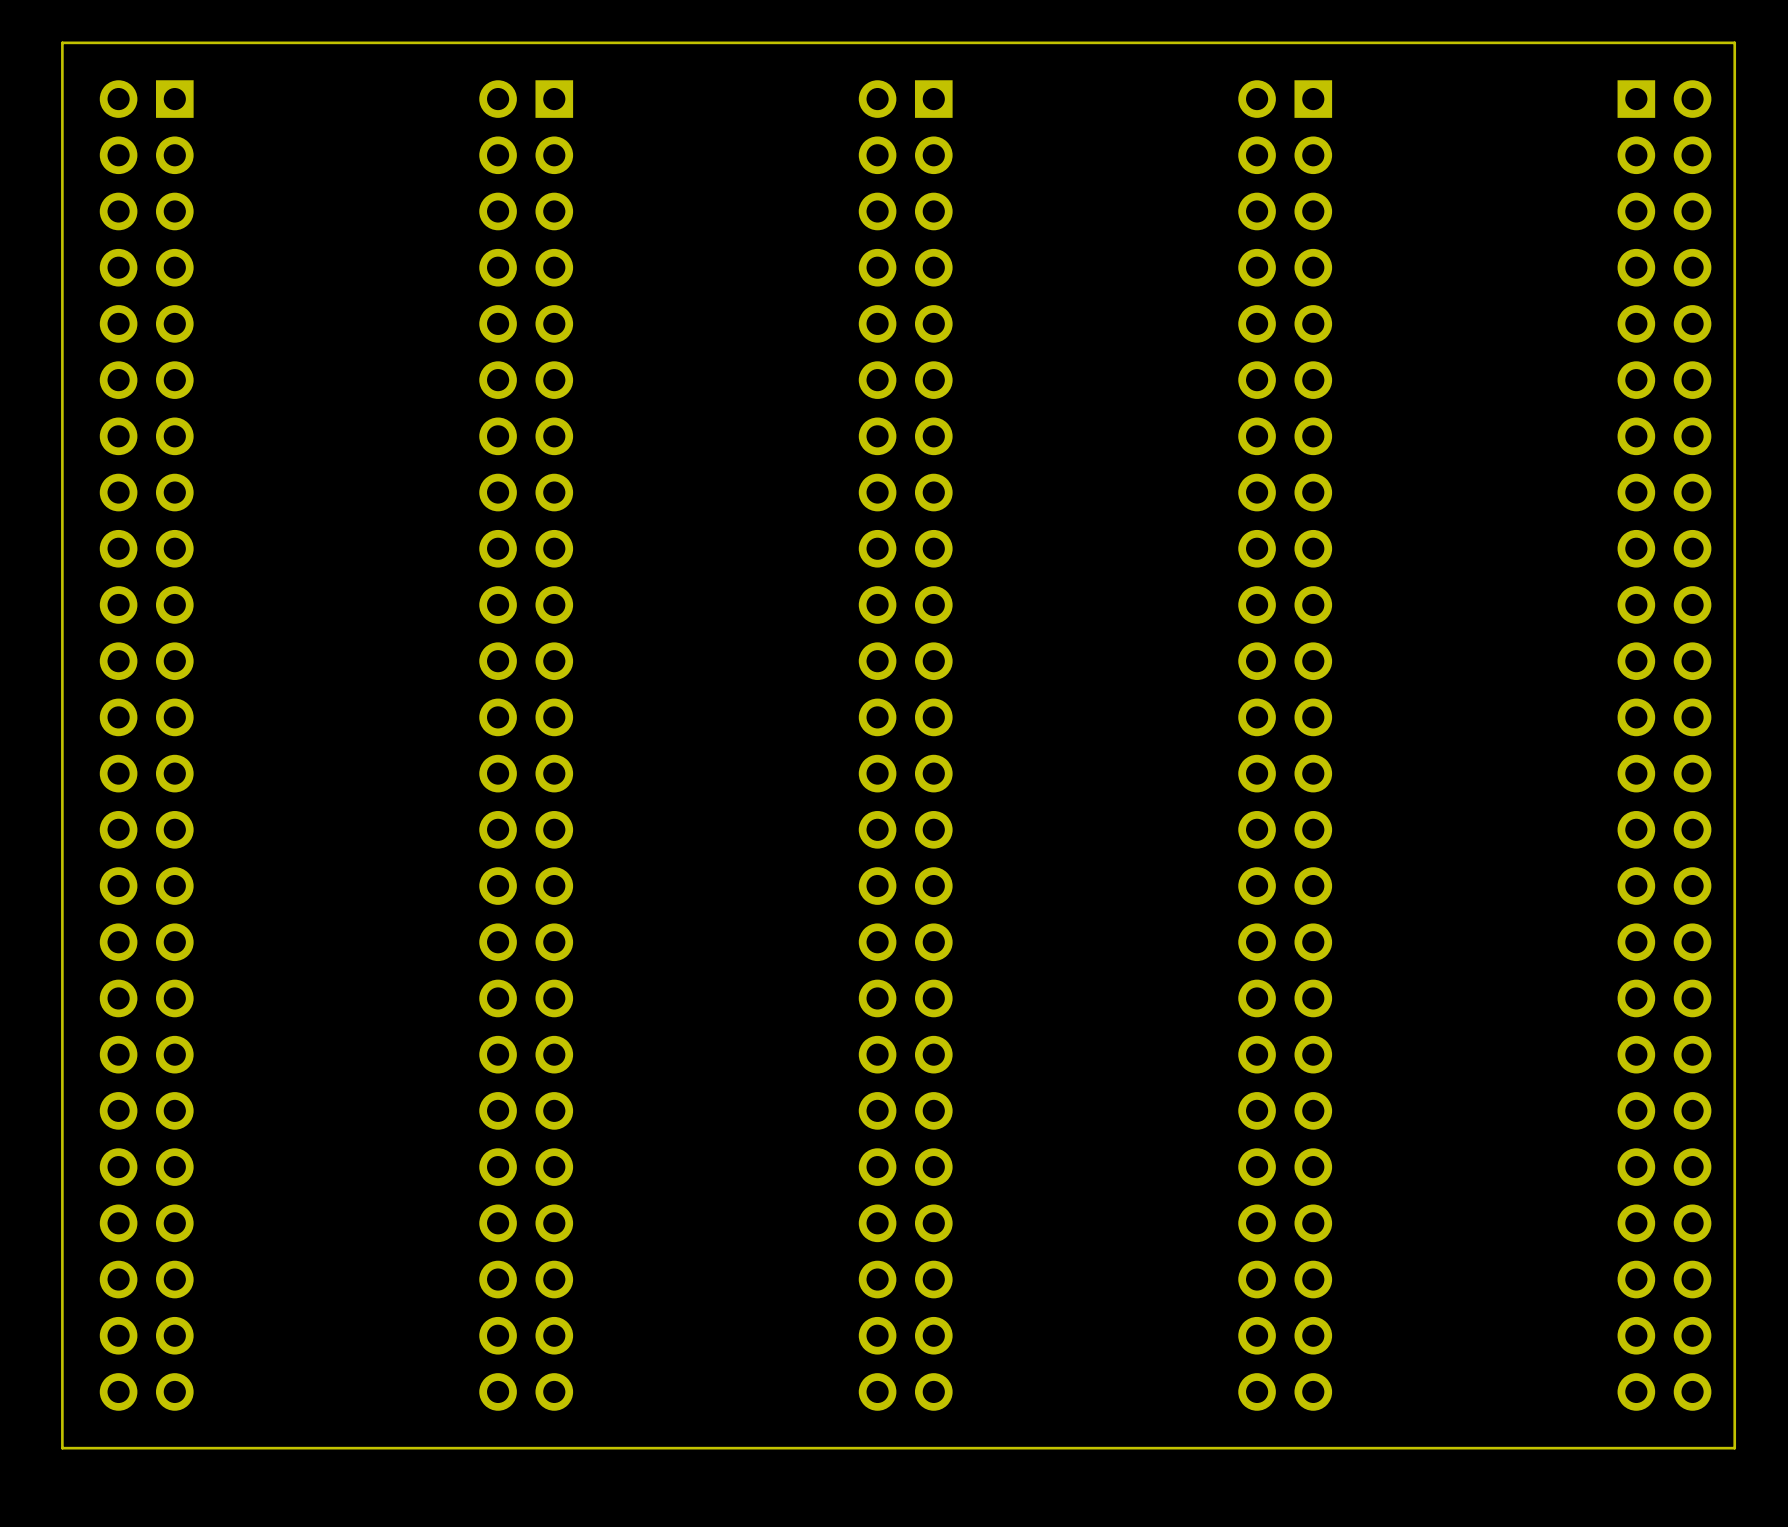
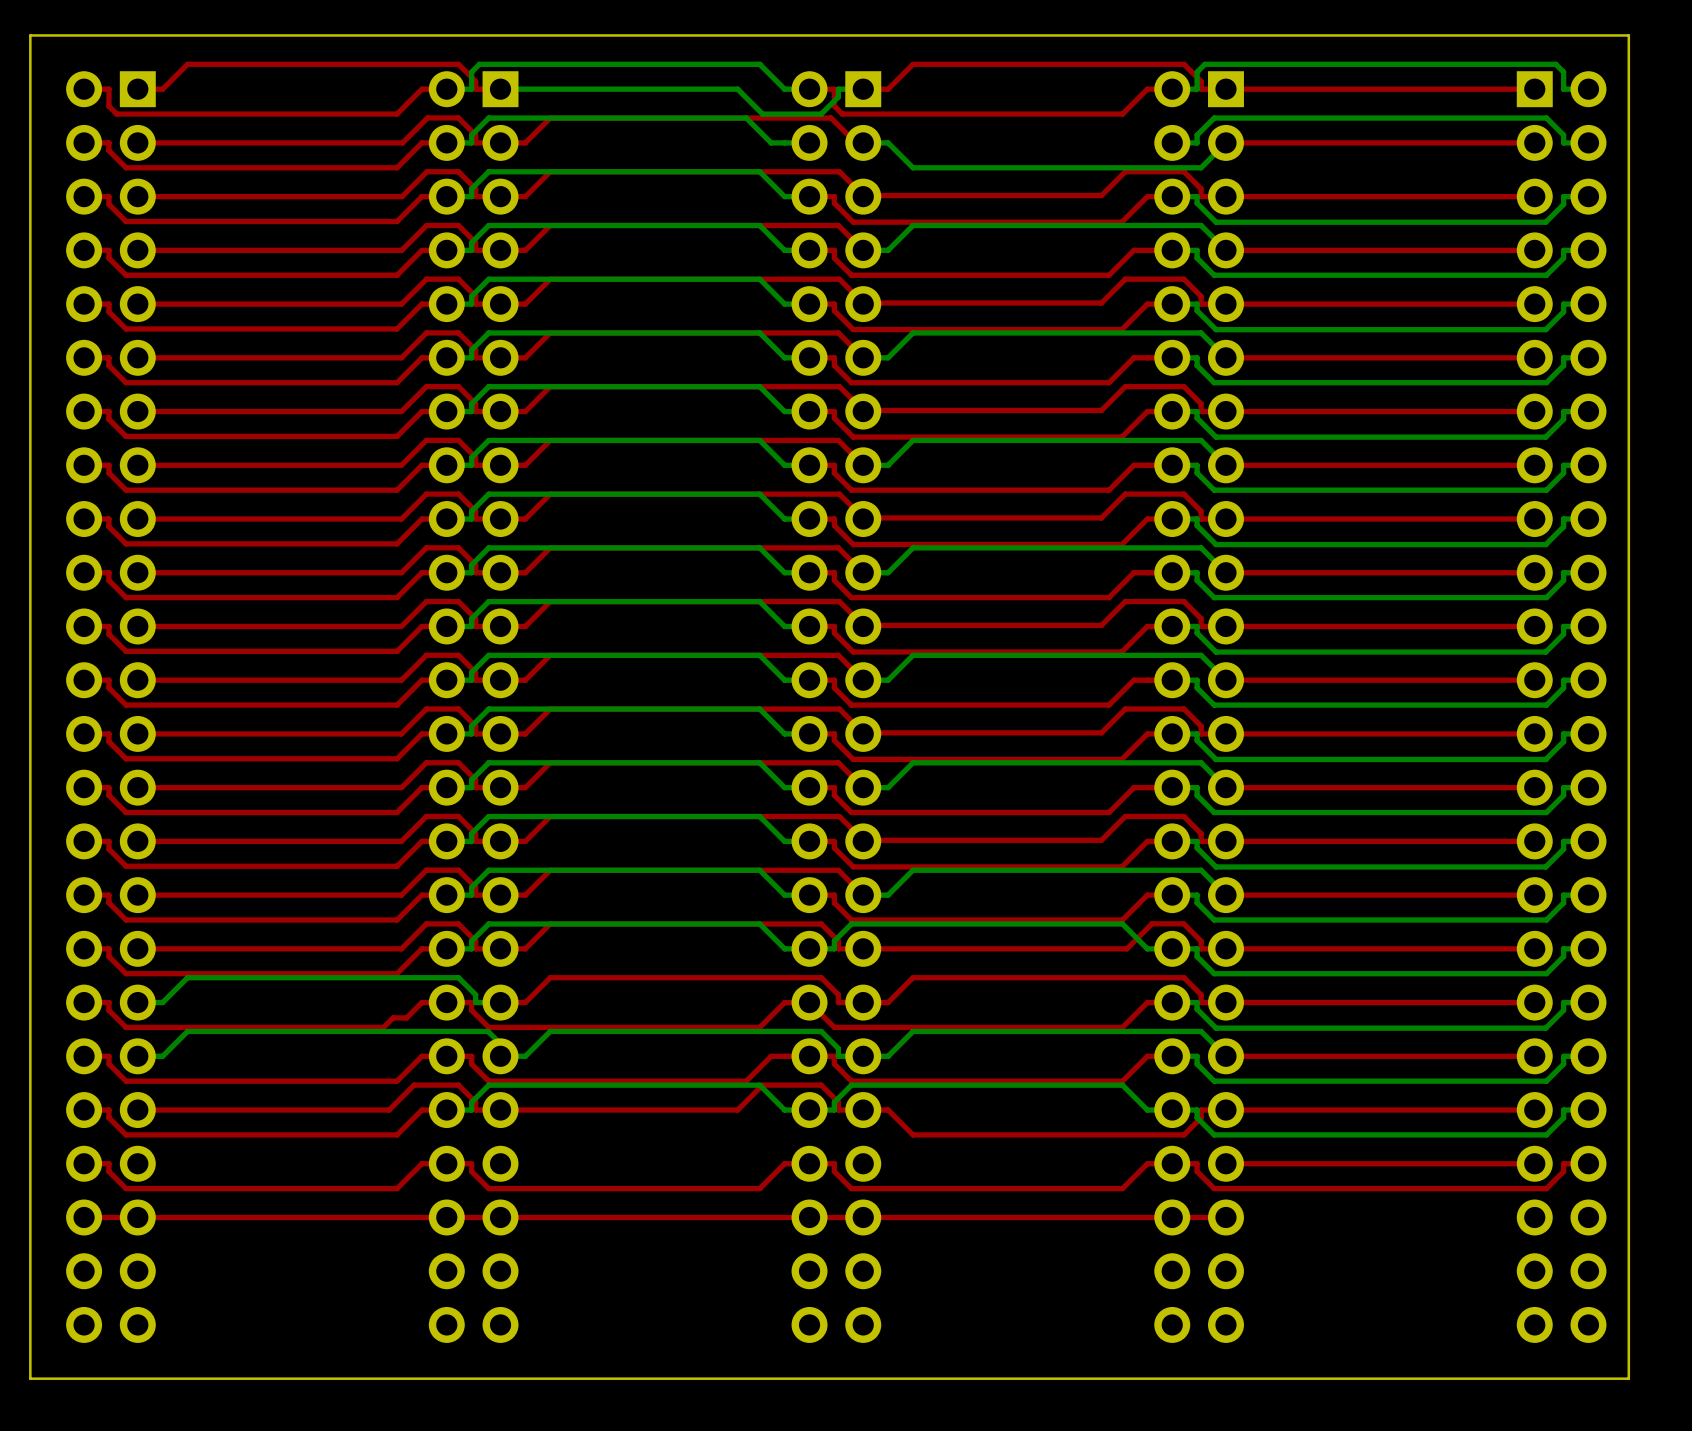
top track: none -> (446, 89) (421, 89) (397, 114) (116, 114) (108, 106) (108, 89) (84, 89)
top track: none -> (500, 89) (475, 89) (475, 81) (458, 64) (187, 64) (162, 89) (137, 89)
bottom track: none -> (809, 89) (784, 89) (759, 64) (479, 64) (471, 72) (471, 89) (446, 89)
bottom track: none -> (863, 89) (838, 89) (838, 96) (821, 114) (762, 114) (737, 89) (500, 89)
top track: none -> (1172, 89) (1147, 89) (1122, 114) (842, 114) (834, 106) (834, 89) (809, 89)
top track: none -> (1534, 89) (1201, 89) (1201, 81) (1184, 64) (912, 64) (888, 89) (863, 89)
bottom track: none -> (1588, 89) (1563, 89) (1563, 72) (1555, 64) (1204, 64) (1197, 72) (1197, 89) (1172, 89)
top track: none -> (446, 142) (421, 142) (397, 167) (126, 167) (108, 150) (108, 142) (84, 142)
bottom track: none -> (809, 142) (771, 142) (746, 118) (488, 118) (471, 135) (471, 142) (446, 142)
top track: none -> (863, 142) (855, 142) (831, 118) (550, 118) (525, 142) (475, 142) (475, 135) (458, 117) (427, 117) (402, 142) (137, 142)
bottom track: none -> (1225, 142) (1201, 167) (912, 167) (888, 142) (863, 142)
top track: none -> (1534, 142) (1225, 142)
bottom track: none -> (1588, 142) (1563, 142) (1563, 135) (1546, 118) (1214, 118) (1197, 135) (1197, 142) (1172, 142)
top track: none -> (863, 195) (1101, 195) (1125, 171) (1183, 171) (1201, 188) (1201, 196) (1534, 196)
top track: none -> (863, 195) (839, 171) (550, 171) (525, 196) (475, 196) (475, 188) (458, 171) (426, 171) (402, 196) (137, 196)
top track: none -> (446, 196) (421, 196) (397, 221) (126, 221) (108, 204) (108, 196) (84, 196)
bottom track: none -> (809, 196) (784, 196) (759, 171) (488, 171) (471, 188) (471, 196) (446, 196)
top track: none -> (1172, 196) (1147, 196) (1121, 222) (853, 222) (834, 203) (834, 196) (809, 196)
bottom track: none -> (1588, 196) (1563, 196) (1563, 204) (1545, 222) (1216, 222) (1197, 203) (1197, 196) (1172, 196)
top track: none -> (446, 250) (421, 250) (397, 275) (126, 275) (108, 258) (108, 250) (84, 250)
bottom track: none -> (809, 250) (784, 250) (759, 225) (488, 225) (471, 242) (471, 250) (446, 250)
top track: none -> (863, 250) (838, 225) (550, 225) (525, 250) (475, 250) (475, 242) (458, 225) (426, 225) (401, 250) (137, 250)
top track: none -> (1172, 250) (1133, 250) (1109, 275) (851, 275) (834, 258) (834, 250) (809, 250)
bottom track: none -> (1225, 250) (1201, 225) (912, 225) (888, 250) (863, 250)
top track: none -> (1534, 250) (1225, 250)
bottom track: none -> (1588, 250) (1563, 250) (1563, 258) (1546, 275) (1214, 275) (1197, 258) (1197, 250) (1172, 250)
top track: none -> (863, 303) (839, 279) (550, 279) (525, 304) (475, 304) (475, 296) (458, 279) (426, 279) (401, 304) (137, 304)
top track: none -> (863, 303) (1101, 303) (1125, 279) (1183, 279) (1201, 296) (1201, 304) (1534, 304)
top track: none -> (446, 304) (421, 304) (397, 328) (126, 328) (108, 311) (108, 304) (84, 304)
bottom track: none -> (809, 304) (784, 304) (759, 279) (488, 279) (471, 296) (471, 304) (446, 304)
top track: none -> (1172, 304) (1147, 304) (1121, 329) (853, 329) (834, 310) (834, 304) (809, 304)
bottom track: none -> (1588, 304) (1563, 304) (1563, 311) (1545, 329) (1216, 329) (1197, 310) (1197, 304) (1172, 304)
top track: none -> (446, 357) (421, 357) (397, 382) (126, 382) (108, 365) (108, 357) (84, 357)
bottom track: none -> (809, 357) (784, 357) (759, 332) (488, 332) (471, 350) (471, 357) (446, 357)
top track: none -> (863, 357) (838, 332) (550, 332) (525, 357) (475, 357) (475, 350) (458, 332) (426, 332) (401, 357) (137, 357)
top track: none -> (1172, 357) (1133, 357) (1109, 382) (851, 382) (834, 365) (834, 357) (809, 357)
bottom track: none -> (1225, 357) (1201, 332) (912, 332) (888, 357) (863, 357)
top track: none -> (1534, 357) (1225, 357)
bottom track: none -> (1588, 357) (1563, 357) (1563, 365) (1546, 382) (1214, 382) (1197, 365) (1197, 357) (1172, 357)
top track: none -> (863, 410) (839, 386) (550, 386) (525, 411) (475, 411) (475, 403) (458, 386) (426, 386) (401, 411) (137, 411)
top track: none -> (863, 410) (1101, 410) (1125, 386) (1183, 386) (1201, 403) (1201, 411) (1534, 411)
top track: none -> (446, 411) (421, 411) (397, 436) (126, 436) (108, 419) (108, 411) (84, 411)
bottom track: none -> (809, 411) (784, 411) (759, 386) (488, 386) (471, 403) (471, 411) (446, 411)
top track: none -> (1172, 411) (1147, 411) (1121, 437) (853, 437) (834, 418) (834, 411) (809, 411)
bottom track: none -> (1588, 411) (1563, 411) (1563, 419) (1545, 437) (1216, 437) (1197, 418) (1197, 411) (1172, 411)
top track: none -> (446, 465) (421, 465) (397, 490) (126, 490) (108, 473) (108, 465) (84, 465)
bottom track: none -> (809, 465) (784, 465) (759, 440) (488, 440) (471, 457) (471, 465) (446, 465)
top track: none -> (863, 465) (838, 440) (550, 440) (525, 465) (475, 465) (475, 457) (458, 440) (426, 440) (401, 465) (137, 465)
top track: none -> (1172, 465) (1133, 465) (1109, 490) (851, 490) (834, 473) (834, 465) (809, 465)
bottom track: none -> (1225, 465) (1201, 440) (912, 440) (888, 465) (863, 465)
top track: none -> (1534, 465) (1225, 465)
bottom track: none -> (1588, 465) (1563, 465) (1563, 473) (1546, 490) (1214, 490) (1197, 473) (1197, 465) (1172, 465)
top track: none -> (863, 517) (839, 494) (550, 494) (525, 519) (475, 519) (475, 511) (458, 494) (426, 494) (401, 519) (137, 519)
top track: none -> (863, 517) (1101, 517) (1125, 494) (1183, 494) (1201, 511) (1201, 519) (1534, 519)
top track: none -> (446, 519) (421, 519) (397, 543) (126, 543) (108, 526) (108, 519) (84, 519)
bottom track: none -> (809, 519) (784, 519) (759, 494) (488, 494) (471, 511) (471, 519) (446, 519)
top track: none -> (1172, 519) (1147, 519) (1121, 544) (853, 544) (834, 525) (834, 519) (809, 519)
bottom track: none -> (1588, 519) (1563, 519) (1563, 526) (1545, 544) (1216, 544) (1197, 525) (1197, 519) (1172, 519)
top track: none -> (446, 572) (421, 572) (397, 597) (126, 597) (108, 580) (108, 572) (84, 572)
bottom track: none -> (809, 572) (784, 572) (759, 547) (488, 547) (471, 564) (471, 572) (446, 572)
top track: none -> (863, 572) (838, 547) (550, 547) (525, 572) (475, 572) (475, 564) (458, 547) (426, 547) (401, 572) (137, 572)
top track: none -> (1172, 572) (1133, 572) (1109, 597) (851, 597) (834, 580) (834, 572) (809, 572)
bottom track: none -> (1225, 572) (1201, 547) (912, 547) (888, 572) (863, 572)
top track: none -> (1534, 572) (1225, 572)
bottom track: none -> (1588, 572) (1563, 572) (1563, 580) (1546, 597) (1214, 597) (1197, 580) (1197, 572) (1172, 572)
top track: none -> (863, 625) (839, 601) (550, 601) (525, 626) (475, 626) (475, 618) (458, 601) (426, 601) (401, 626) (137, 626)
top track: none -> (863, 625) (1101, 625) (1125, 601) (1183, 601) (1201, 618) (1201, 626) (1534, 626)
top track: none -> (446, 626) (421, 626) (397, 651) (126, 651) (108, 634) (108, 626) (84, 626)
bottom track: none -> (809, 626) (784, 626) (759, 601) (488, 601) (471, 618) (471, 626) (446, 626)
top track: none -> (1172, 626) (1147, 626) (1121, 651) (853, 651) (834, 633) (834, 626) (809, 626)
bottom track: none -> (1588, 626) (1563, 626) (1563, 634) (1545, 652) (1216, 652) (1197, 633) (1197, 626) (1172, 626)
top track: none -> (446, 680) (421, 680) (397, 705) (126, 705) (108, 687) (108, 680) (84, 680)
bottom track: none -> (809, 680) (784, 680) (759, 655) (488, 655) (471, 672) (471, 680) (446, 680)
top track: none -> (863, 680) (838, 655) (550, 655) (525, 680) (475, 680) (475, 672) (458, 655) (426, 655) (401, 680) (137, 680)
top track: none -> (1172, 680) (1133, 680) (1109, 705) (851, 705) (834, 687) (834, 680) (809, 680)
bottom track: none -> (1225, 680) (1201, 655) (912, 655) (888, 680) (863, 680)
top track: none -> (1534, 680) (1225, 680)
bottom track: none -> (1588, 680) (1563, 680) (1563, 687) (1546, 705) (1214, 705) (1197, 687) (1197, 680) (1172, 680)
top track: none -> (863, 732) (839, 709) (550, 709) (525, 733) (475, 733) (475, 726) (458, 709) (426, 709) (401, 733) (137, 733)
top track: none -> (863, 732) (1101, 732) (1125, 709) (1183, 709) (1201, 726) (1201, 733) (1534, 733)
top track: none -> (446, 733) (421, 733) (397, 758) (126, 758) (108, 741) (108, 733) (84, 733)
bottom track: none -> (809, 733) (784, 733) (759, 709) (488, 709) (471, 726) (471, 733) (446, 733)
top track: none -> (1172, 733) (1147, 733) (1121, 759) (853, 759) (834, 740) (834, 733) (809, 733)
bottom track: none -> (1588, 733) (1563, 733) (1563, 741) (1545, 759) (1216, 759) (1197, 740) (1197, 733) (1172, 733)
top track: none -> (446, 787) (421, 787) (397, 812) (126, 812) (108, 795) (108, 787) (84, 787)
bottom track: none -> (809, 787) (784, 787) (759, 762) (488, 762) (471, 779) (471, 787) (446, 787)
top track: none -> (863, 787) (838, 762) (550, 762) (525, 787) (475, 787) (475, 779) (458, 762) (426, 762) (401, 787) (137, 787)
top track: none -> (1172, 787) (1133, 787) (1109, 812) (851, 812) (834, 795) (834, 787) (809, 787)
bottom track: none -> (1225, 787) (1201, 762) (912, 762) (888, 787) (863, 787)
top track: none -> (1534, 787) (1225, 787)
bottom track: none -> (1588, 787) (1563, 787) (1563, 795) (1546, 812) (1214, 812) (1197, 795) (1197, 787) (1172, 787)
top track: none -> (863, 840) (839, 816) (550, 816) (525, 841) (475, 841) (475, 833) (458, 816) (426, 816) (401, 841) (137, 841)
top track: none -> (863, 840) (1101, 840) (1125, 816) (1183, 816) (1201, 833) (1201, 841) (1534, 841)
top track: none -> (446, 841) (421, 841) (397, 866) (126, 866) (108, 849) (108, 841) (84, 841)
bottom track: none -> (809, 841) (784, 841) (759, 816) (488, 816) (471, 833) (471, 841) (446, 841)
top track: none -> (1172, 841) (1147, 841) (1121, 866) (853, 866) (834, 848) (834, 841) (809, 841)
bottom track: none -> (1588, 841) (1563, 841) (1563, 849) (1545, 866) (1216, 866) (1197, 848) (1197, 841) (1172, 841)
top track: none -> (446, 895) (421, 895) (397, 919) (126, 919) (108, 902) (108, 895) (84, 895)
bottom track: none -> (809, 895) (784, 895) (759, 870) (488, 870) (471, 887) (471, 895) (446, 895)
top track: none -> (863, 895) (838, 870) (550, 870) (525, 895) (475, 895) (475, 887) (458, 870) (426, 870) (401, 895) (137, 895)
top track: none -> (1172, 895) (1147, 895) (1122, 919) (851, 919) (834, 902) (834, 895) (809, 895)
bottom track: none -> (1225, 895) (1201, 870) (912, 870) (888, 895) (863, 895)
top track: none -> (1534, 895) (1225, 895)
bottom track: none -> (1588, 895) (1563, 895) (1563, 902) (1546, 919) (1214, 919) (1197, 902) (1197, 895) (1172, 895)
top track: none -> (446, 948) (421, 948) (397, 973) (126, 973) (108, 956) (108, 948) (84, 948)
top track: none -> (1534, 948) (1201, 948) (1201, 941) (1183, 923) (1151, 923) (1126, 948) (838, 948) (838, 941) (821, 923) (550, 923) (525, 948) (475, 948) (475, 941) (458, 923) (426, 923) (401, 948) (137, 948)
bottom track: none -> (1588, 948) (1563, 948) (1563, 956) (1546, 973) (1214, 973) (1197, 956) (1197, 948) (1147, 948) (1122, 923) (851, 923) (834, 941) (834, 948) (784, 948) (759, 923) (488, 923) (471, 941) (471, 948) (446, 948)
bottom track: none -> (500, 1002) (475, 1002) (475, 994) (458, 977) (187, 977) (162, 1002) (137, 1002)
top track: none -> (1172, 1002) (1147, 1002) (1122, 1027) (834, 1027) (809, 1002) (784, 1002) (759, 1027) (488, 1027) (471, 1010) (471, 1002) (421, 1002) (406, 1017) (393, 1017) (383, 1027) (126, 1027) (108, 1010) (108, 1002) (84, 1002)
top track: none -> (1534, 1002) (1201, 1002) (1201, 994) (1184, 977) (912, 977) (888, 1002) (838, 1002) (838, 994) (821, 977) (550, 977) (525, 1002) (500, 1002)
bottom track: none -> (1588, 1002) (1563, 1002) (1563, 1010) (1545, 1028) (1216, 1028) (1197, 1009) (1197, 1002) (1172, 1002)
bottom track: none -> (512, 1056) (488, 1031) (187, 1031) (162, 1056) (137, 1056)
top track: none -> (1172, 1056) (1147, 1056) (1122, 1081) (851, 1081) (834, 1064) (834, 1056) (771, 1056) (746, 1081) (488, 1081) (471, 1064) (471, 1056) (421, 1056) (397, 1081) (126, 1081) (108, 1064) (108, 1056) (84, 1056)
bottom track: none -> (1225, 1056) (1201, 1031) (912, 1031) (888, 1056) (838, 1056) (838, 1048) (821, 1031) (550, 1031) (525, 1056) (500, 1056)
top track: none -> (1534, 1056) (1225, 1056)
bottom track: none -> (1588, 1056) (1563, 1056) (1563, 1064) (1546, 1081) (1214, 1081) (1197, 1064) (1197, 1056) (1172, 1056)
top track: none -> (446, 1110) (421, 1110) (397, 1134) (126, 1134) (108, 1117) (108, 1110) (84, 1110)
top track: none -> (1534, 1110) (1201, 1110) (1201, 1117) (1184, 1134) (912, 1134) (888, 1110) (838, 1110) (838, 1102) (821, 1085) (762, 1085) (737, 1110) (475, 1110) (475, 1102) (458, 1085) (414, 1085) (389, 1110) (137, 1110)
bottom track: none -> (1588, 1110) (1563, 1110) (1563, 1117) (1546, 1134) (1214, 1134) (1197, 1117) (1197, 1110) (1147, 1110) (1122, 1085) (851, 1085) (834, 1102) (834, 1110) (784, 1110) (759, 1085) (488, 1085) (471, 1102) (471, 1110) (446, 1110)
top track: none -> (1534, 1163) (1225, 1163)
top track: none -> (1588, 1163) (1563, 1163) (1563, 1171) (1546, 1188) (1214, 1188) (1197, 1171) (1197, 1163) (1147, 1163) (1122, 1188) (851, 1188) (834, 1171) (834, 1163) (784, 1163) (759, 1188) (488, 1188) (471, 1171) (471, 1163) (421, 1163) (397, 1188) (126, 1188) (108, 1171) (108, 1163) (84, 1163)
top track: none -> (1225, 1217) (84, 1217)

